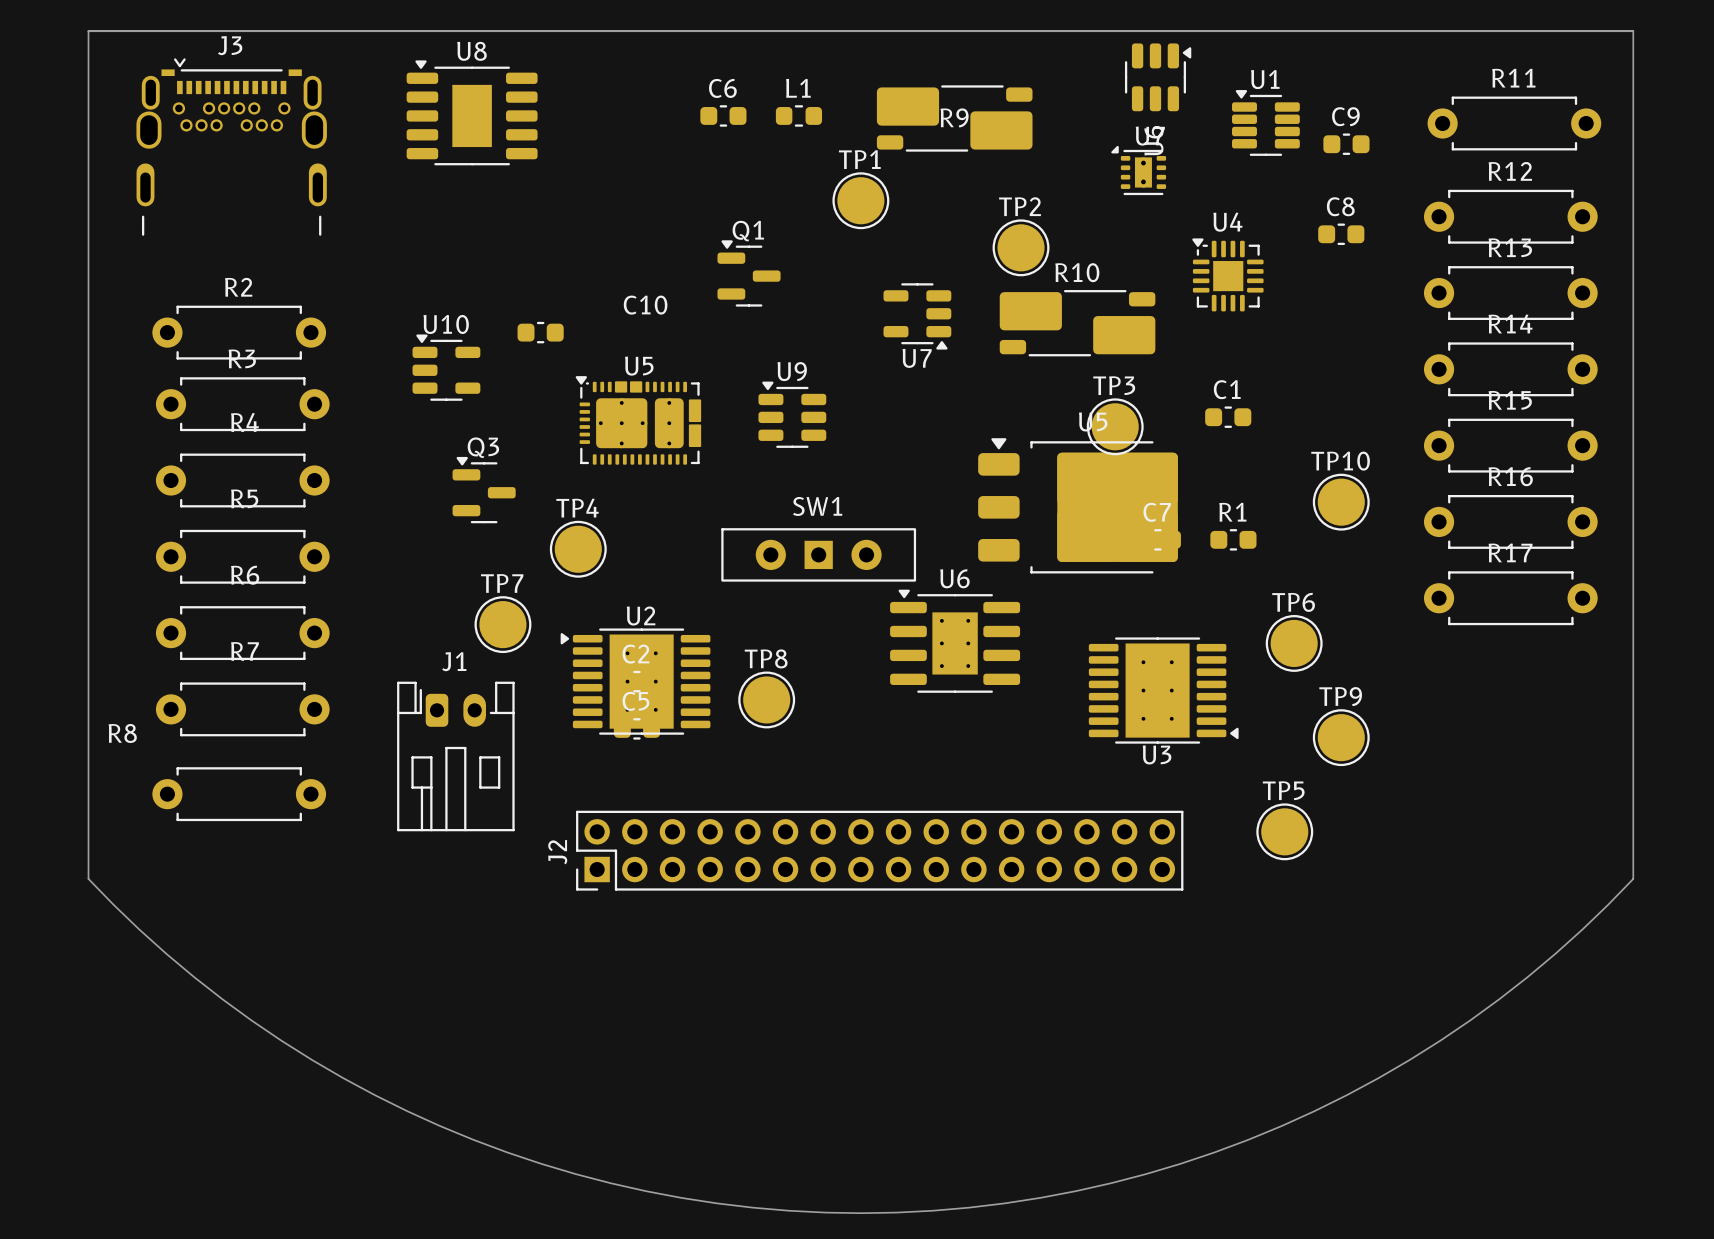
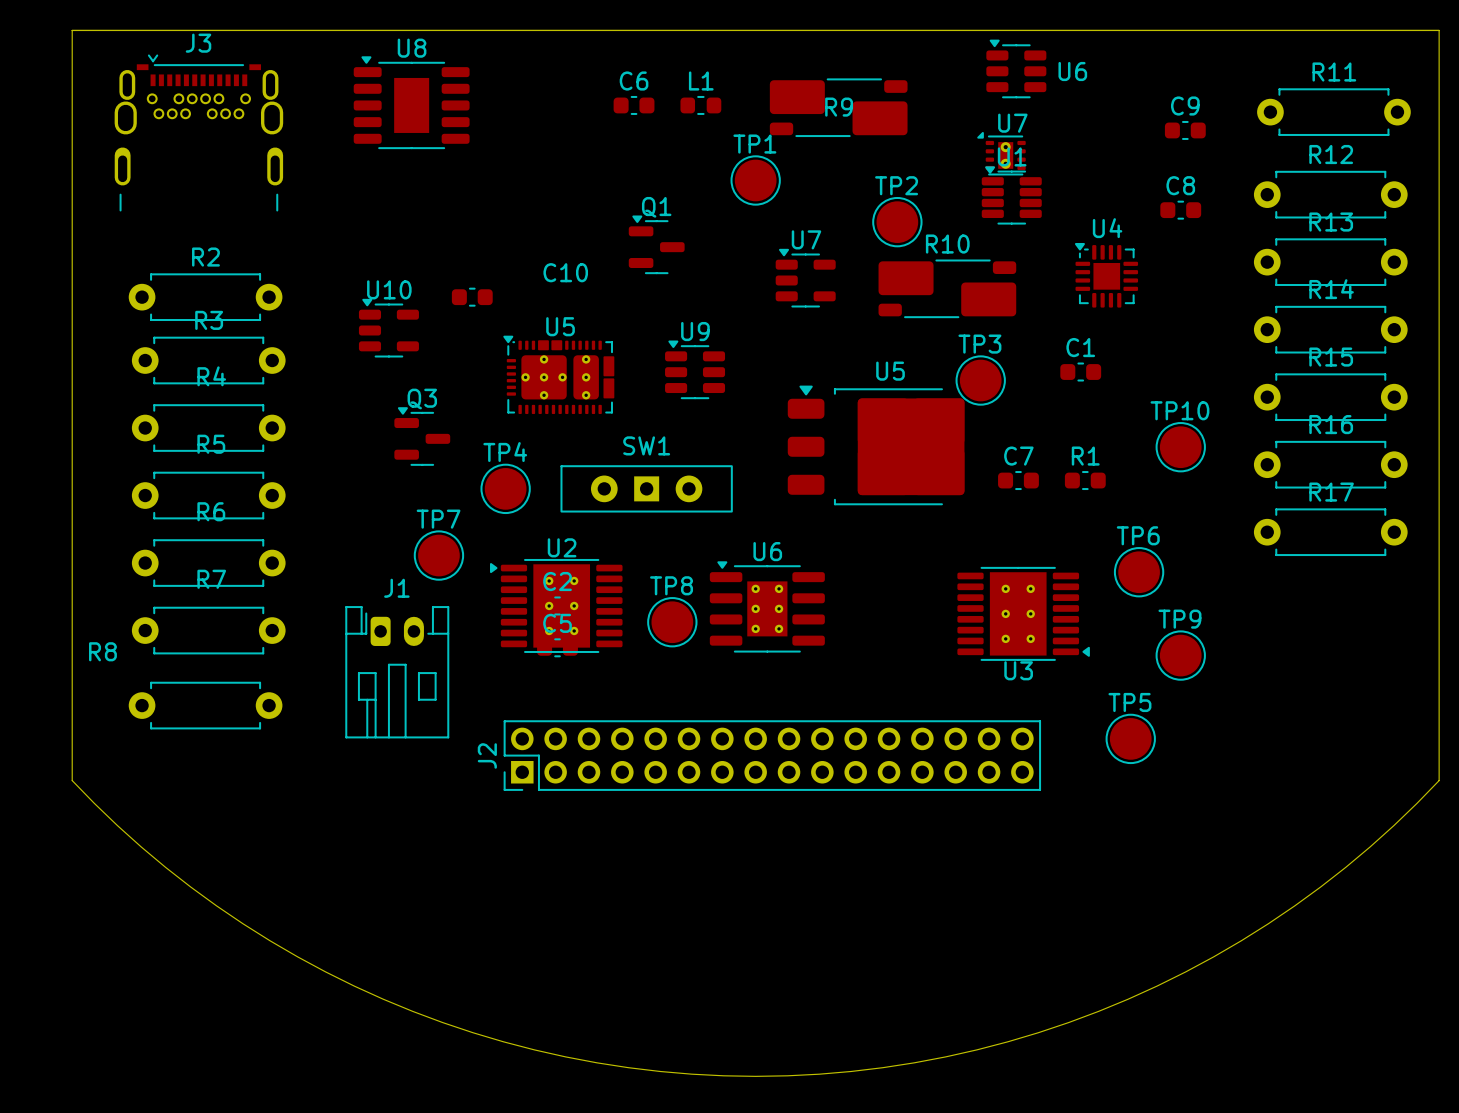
U6 rotation: 0° (1158, 77) -> 90° counterclockwise (1016, 68)
U1 position: (1265, 122) -> (1011, 195)
U4 position: (1227, 274) -> (1106, 275)
U7 rotation: 0° (917, 316) -> 180° (805, 278)
U5 position: (1078, 505) -> (876, 445)
SW1 position: (818, 554) -> (646, 488)
U6 position: (955, 641) -> (767, 606)

